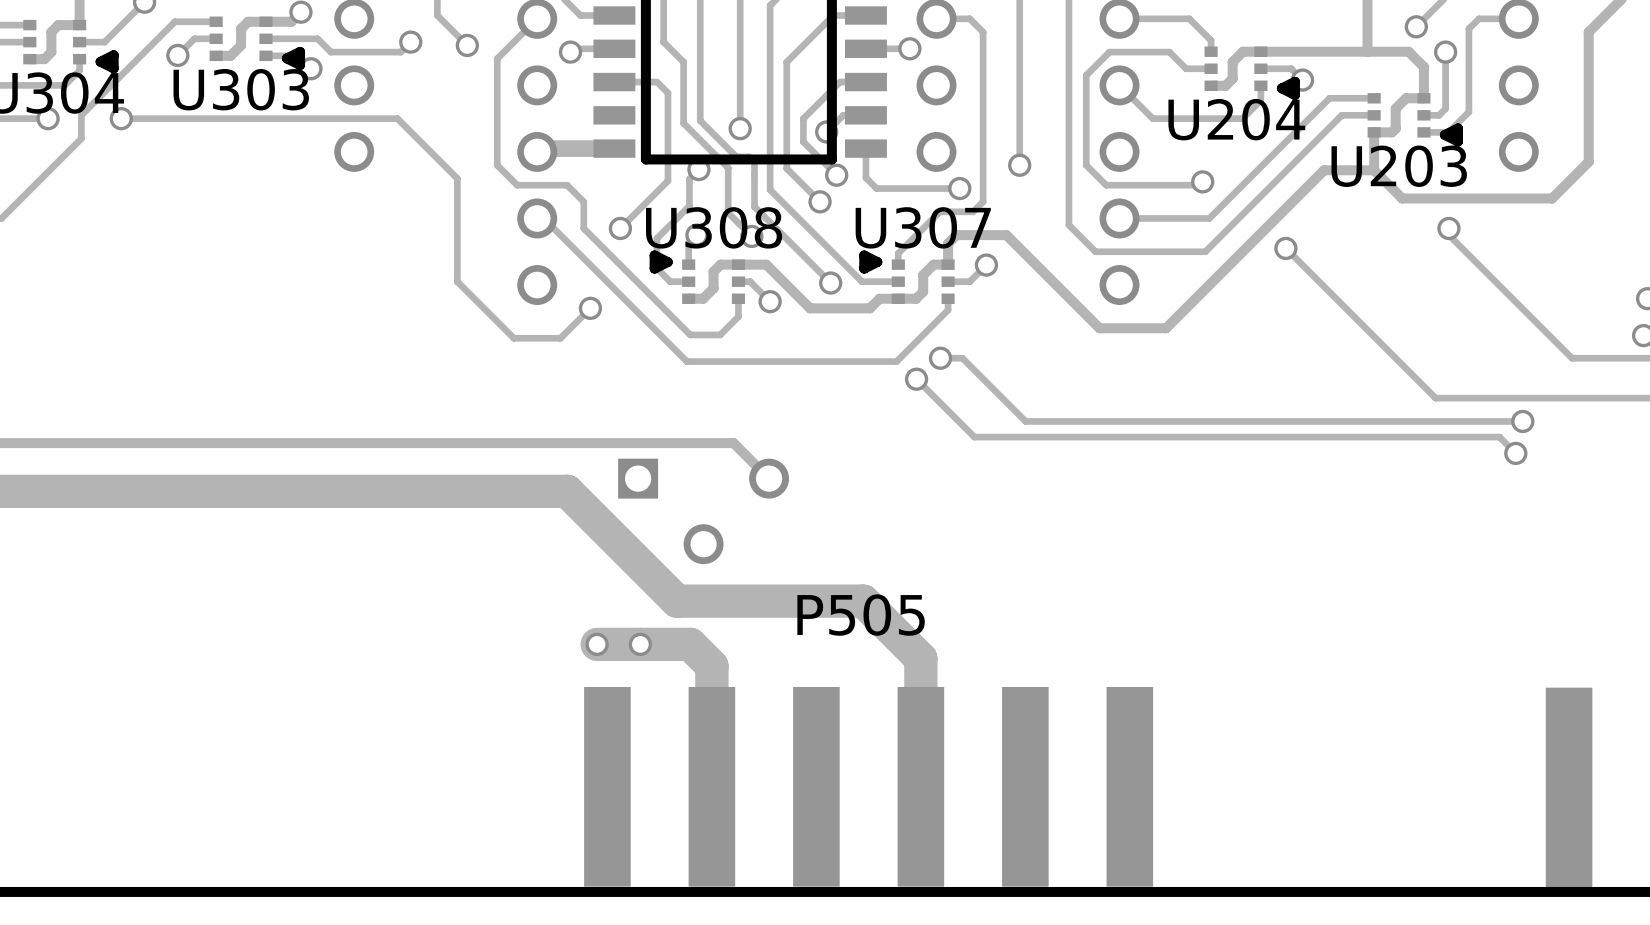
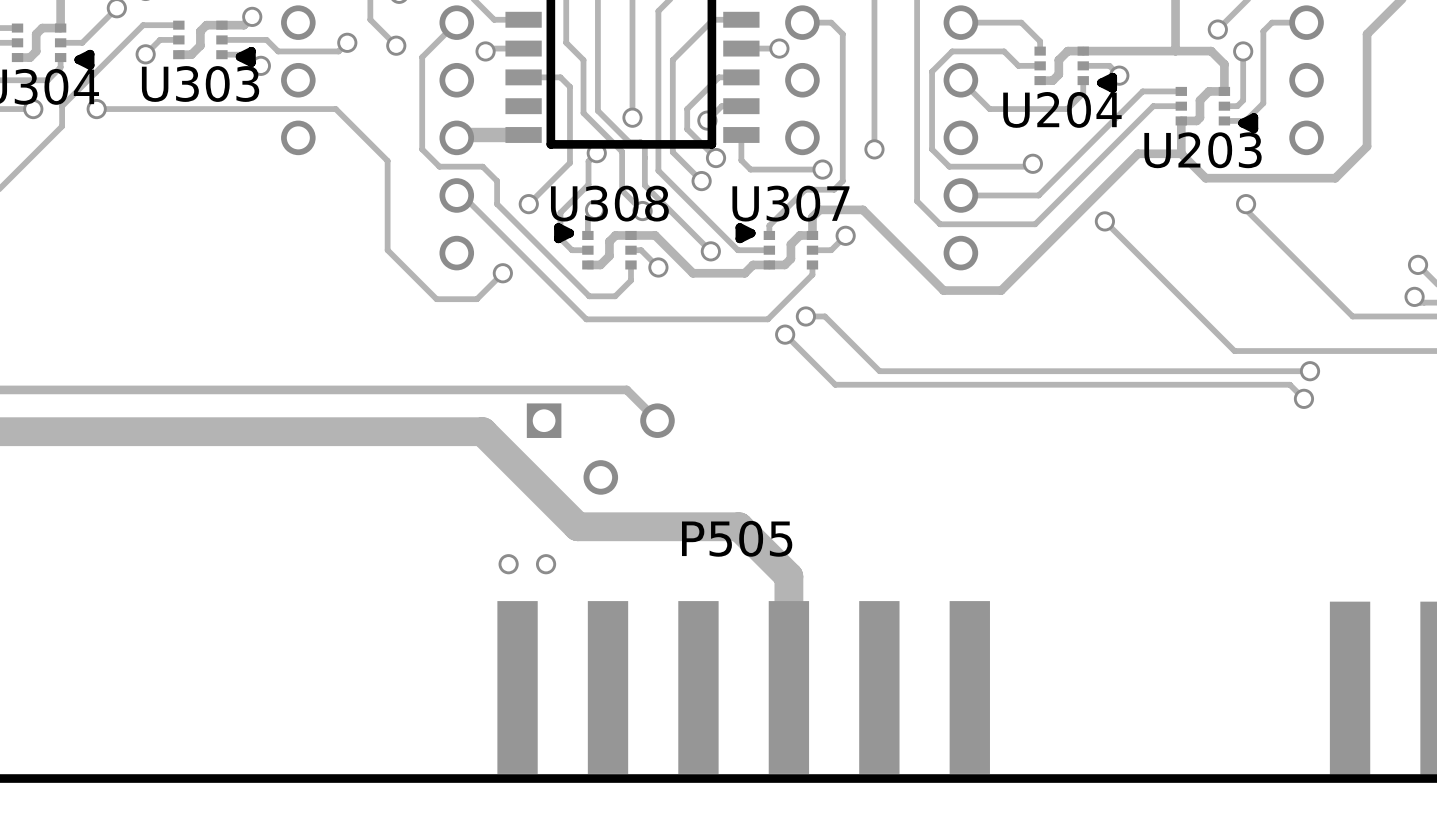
track: (597, 644) (690, 644) (711, 666) (711, 786) -> none

